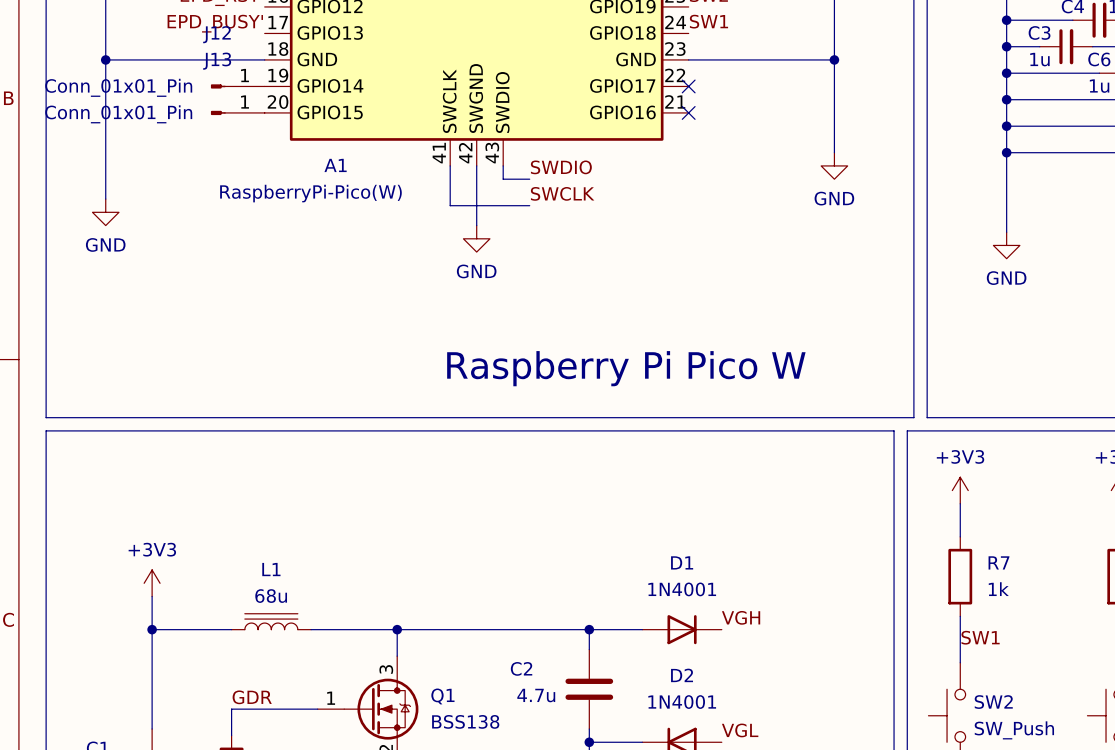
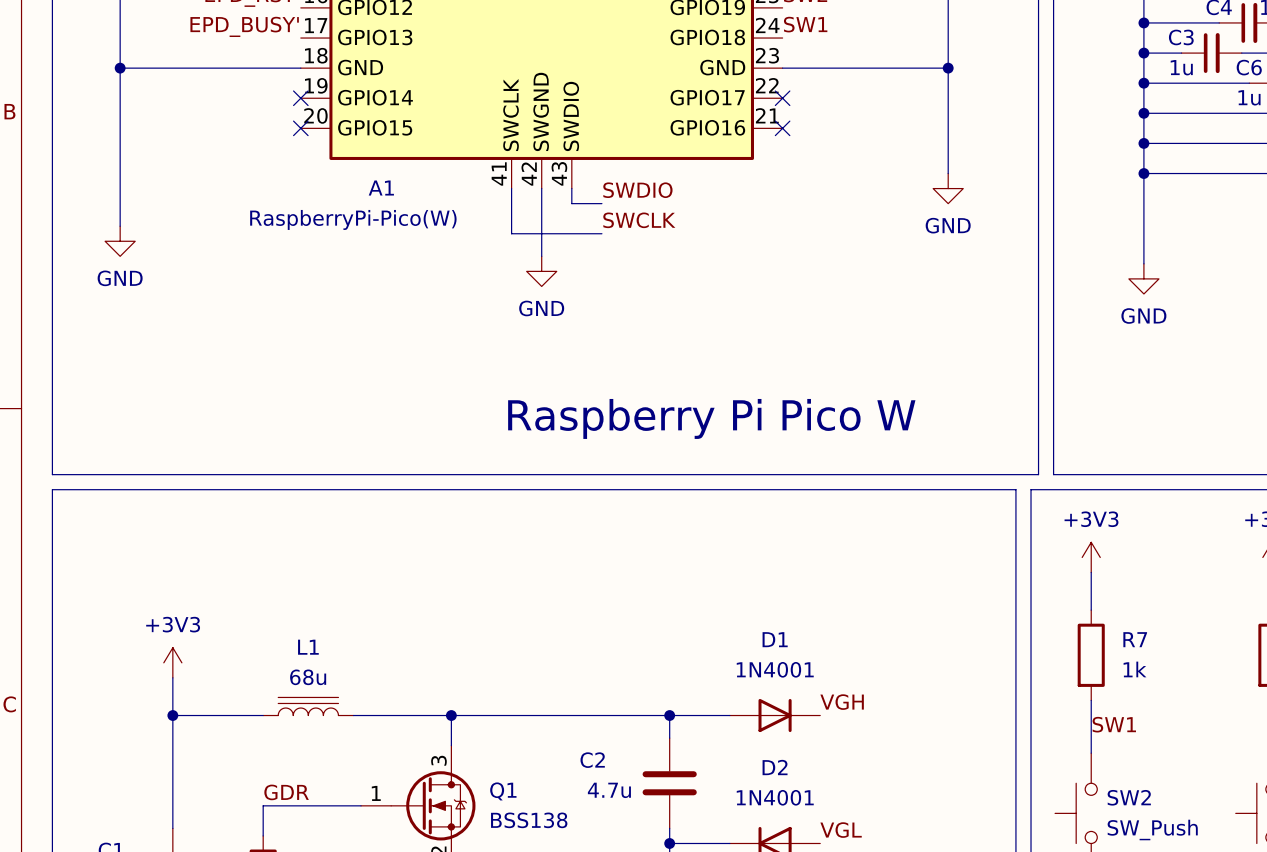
J12: Conn_01x01_Pin (237, 86) -> none
no-connect mark: none -> (300, 98)
J13: Conn_01x01_Pin (237, 112) -> none
no-connect mark: none -> (300, 128)

